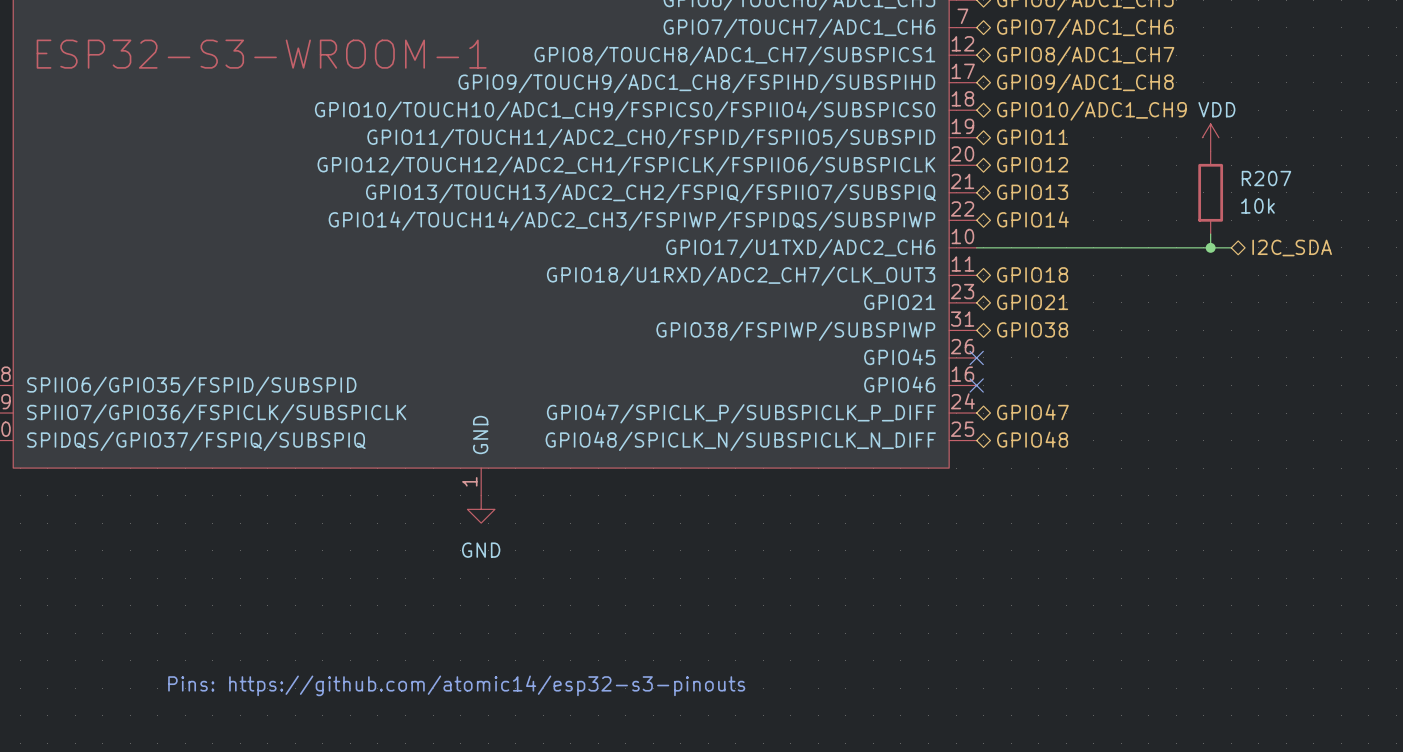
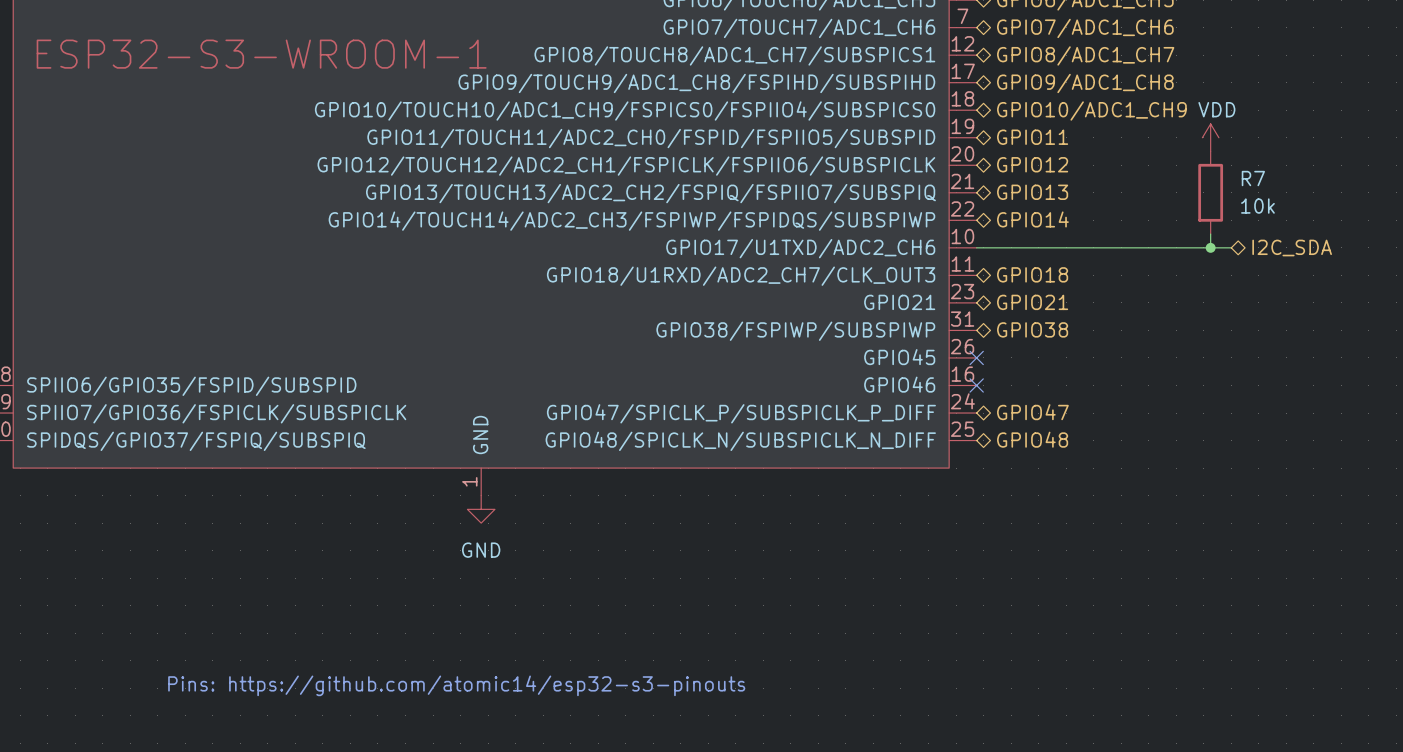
R207 name: R207 (1266, 178) -> R7 (1253, 178)

